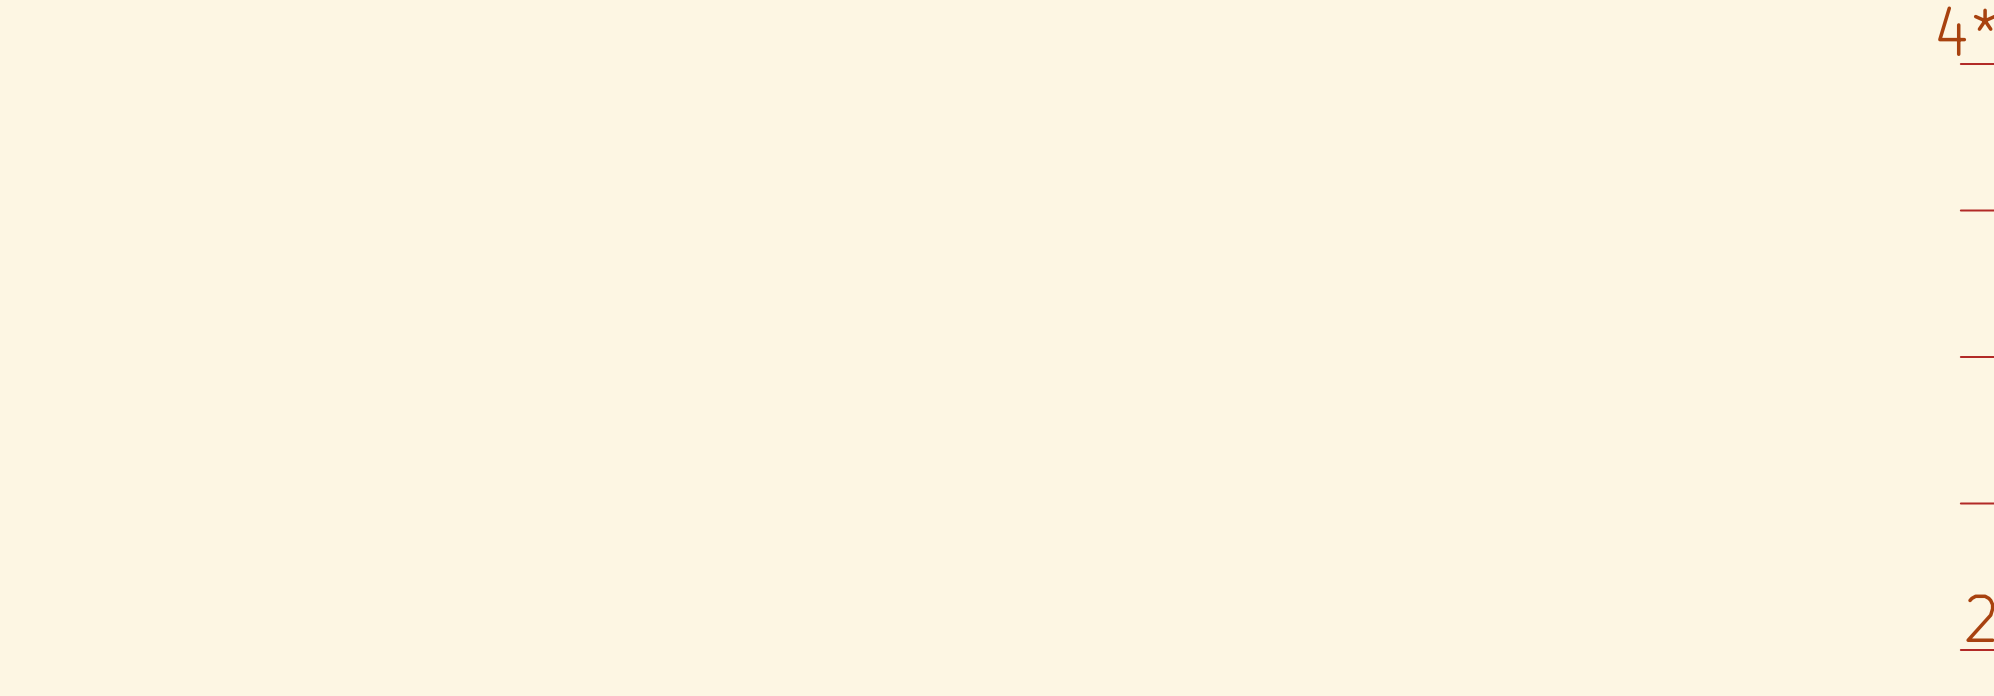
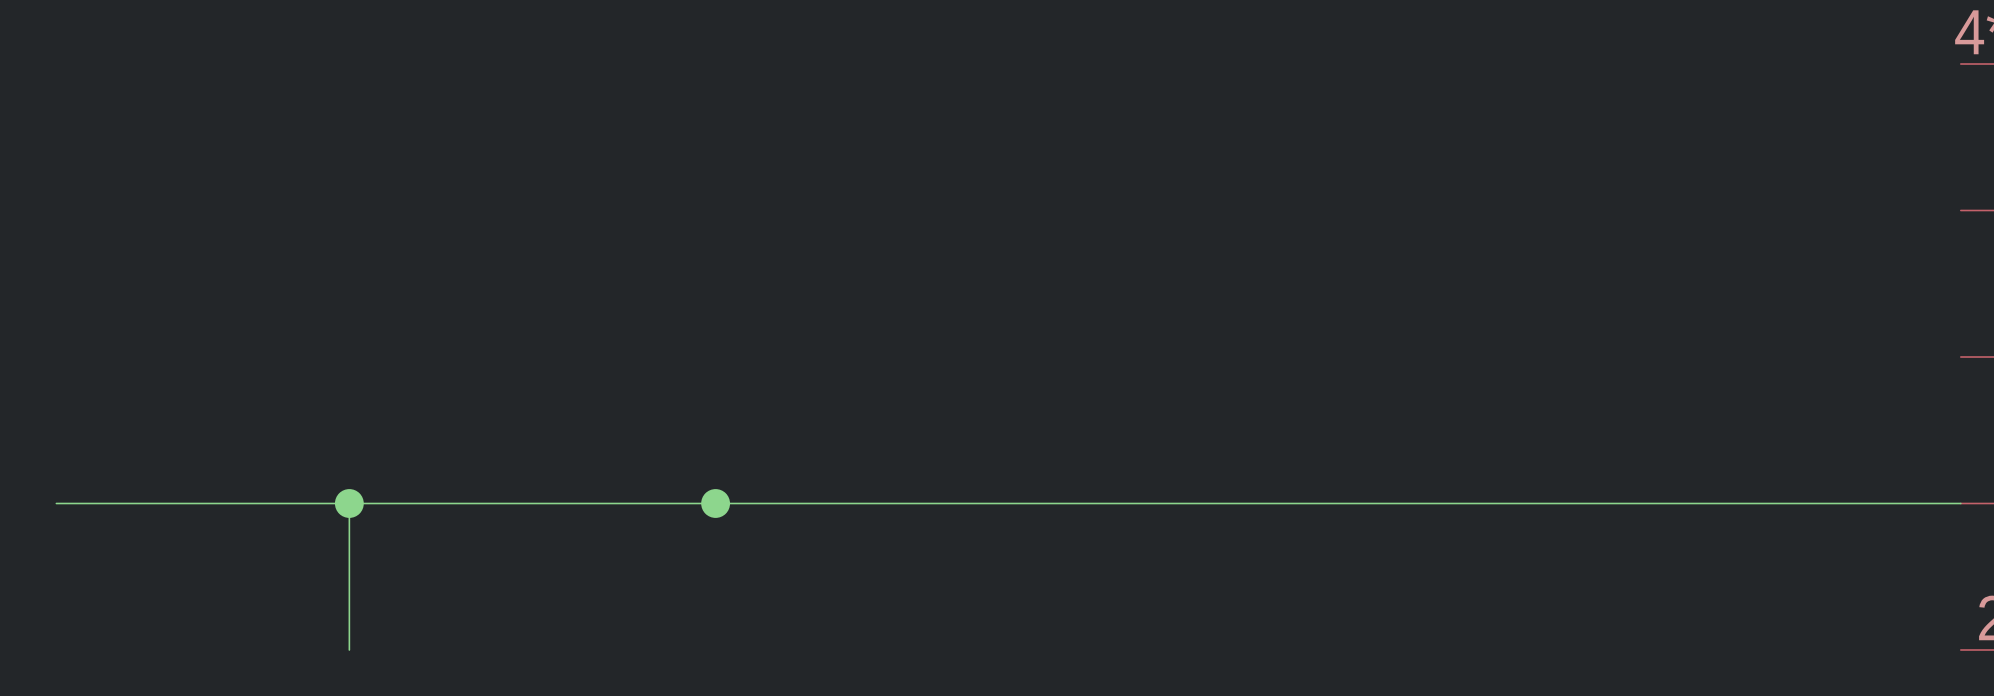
wire: none -> (56, 503) (1960, 503)
wire: none -> (349, 503) (349, 649)
junction: none -> (349, 503)
junction: none -> (715, 503)

